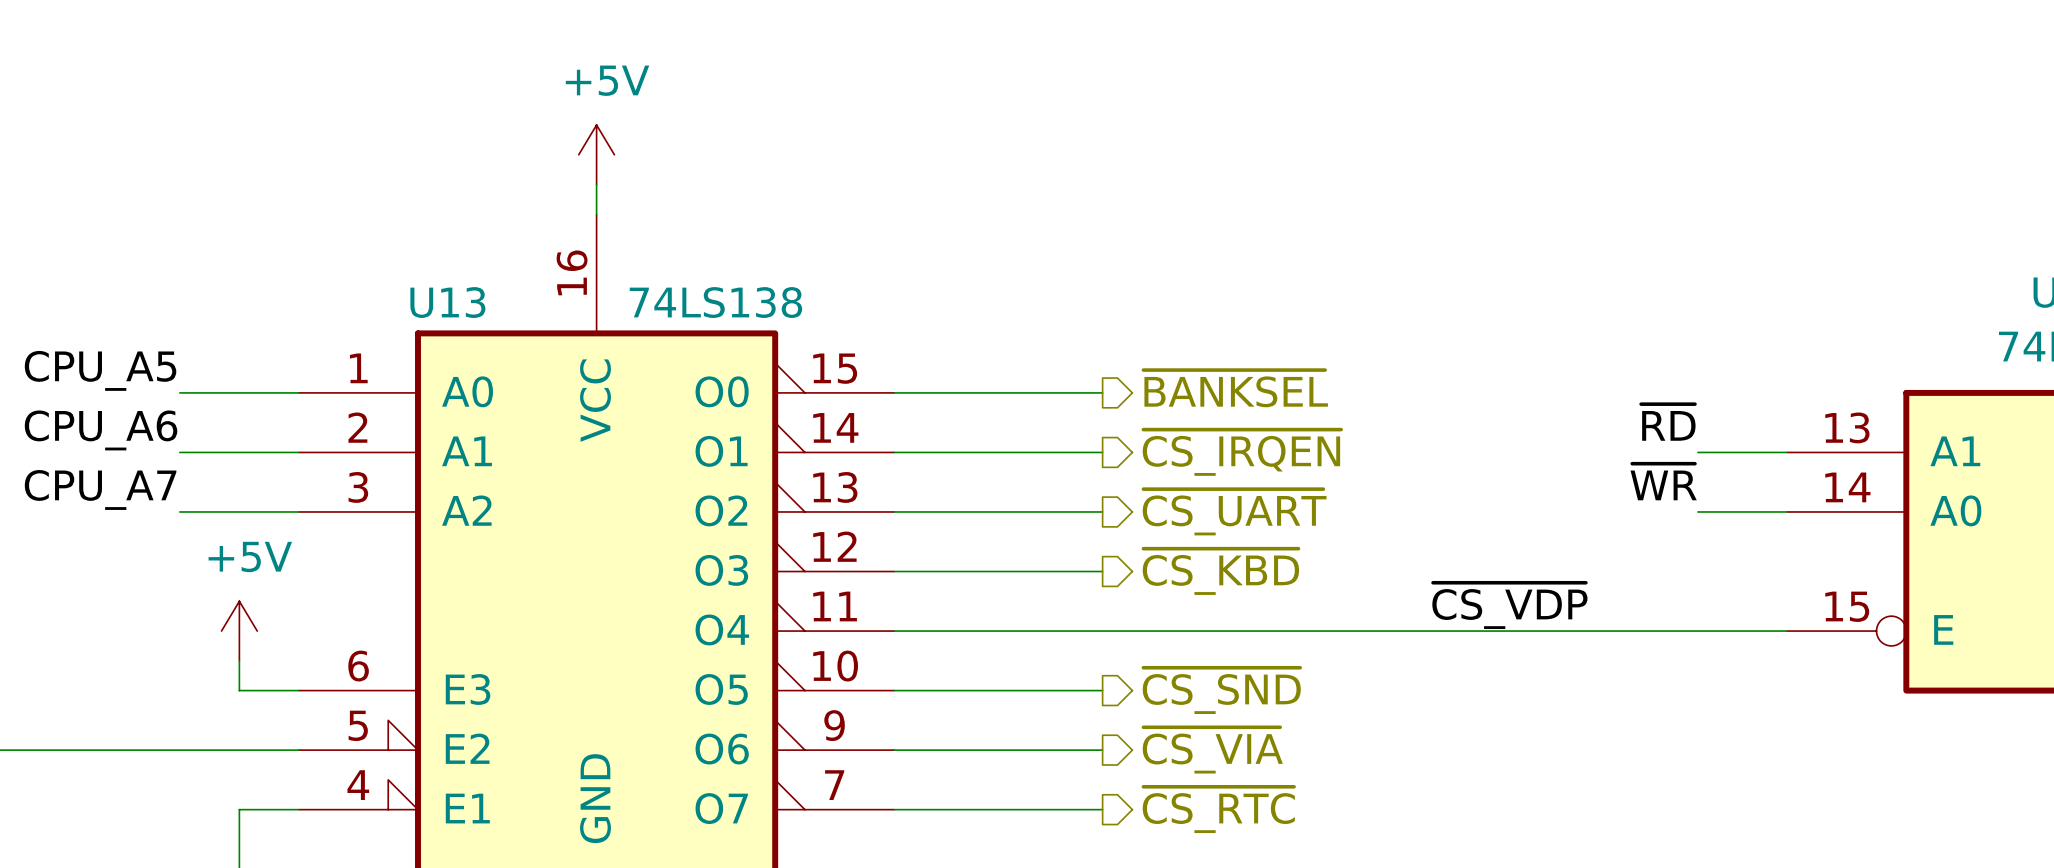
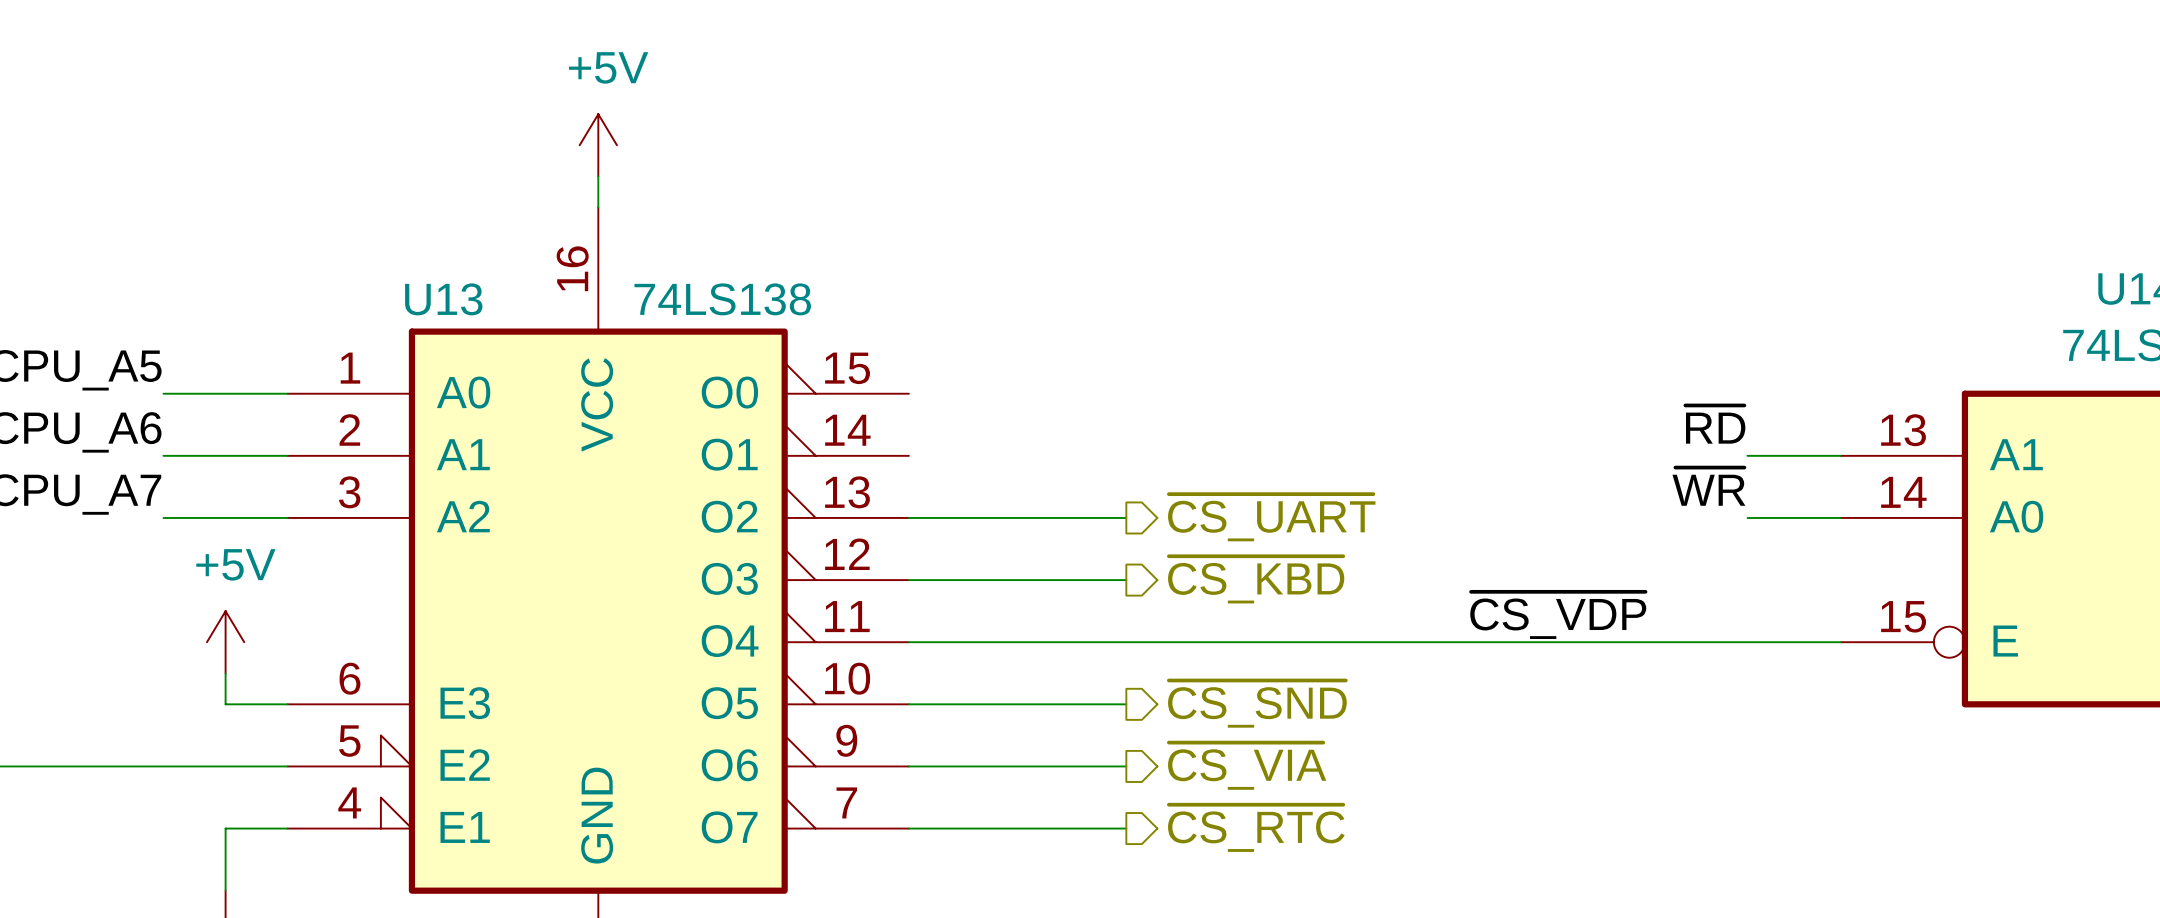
hierarchical label: ~{BANKSEL} (1235, 388) -> none
wire: (894, 392) (1102, 392) -> none
wire: (894, 452) (1102, 452) -> none
hierarchical label: ~{CS_IRQEN} (1241, 452) -> none

